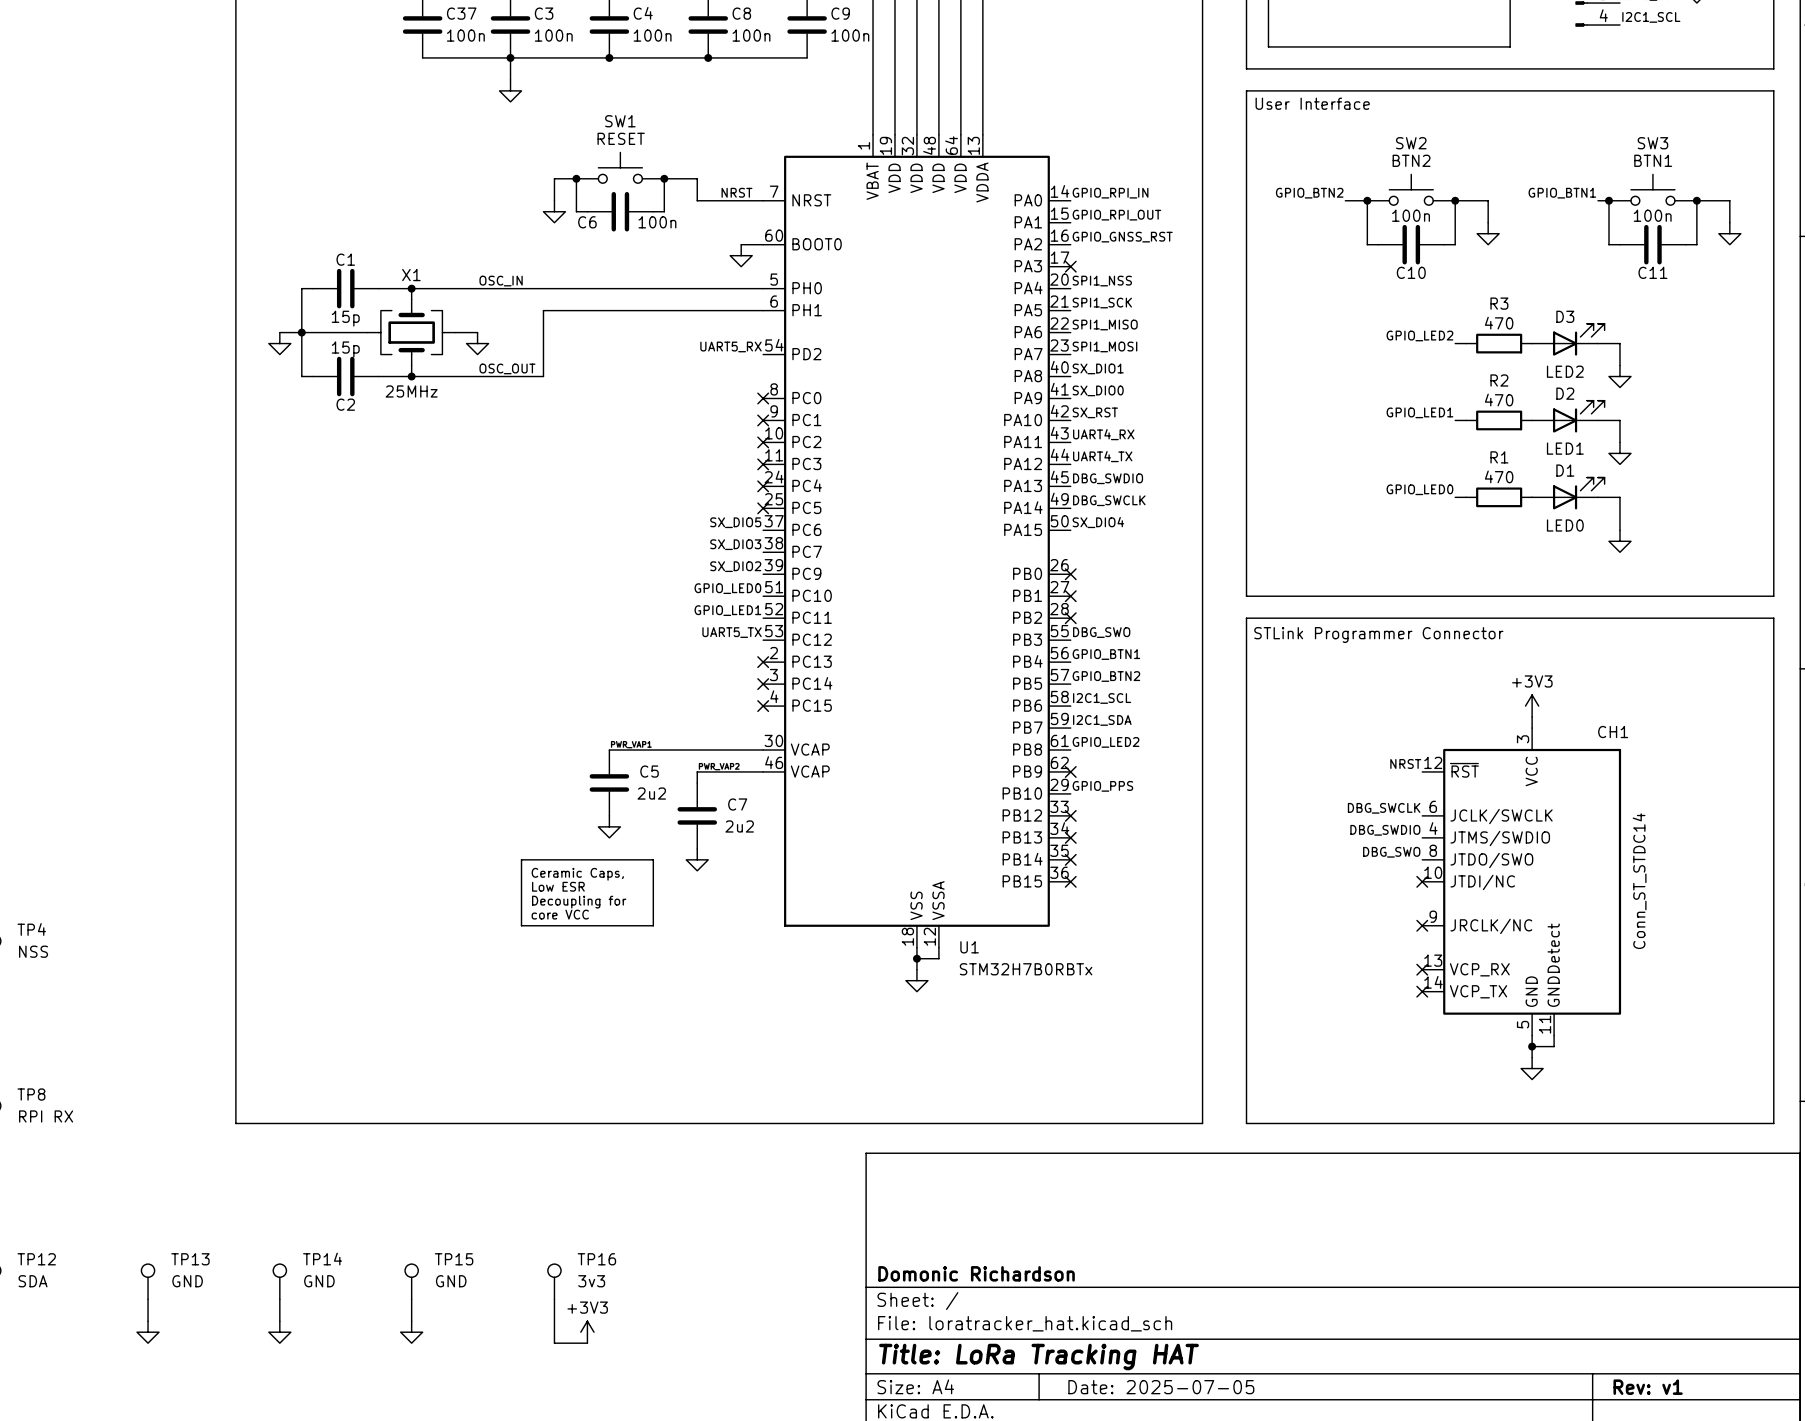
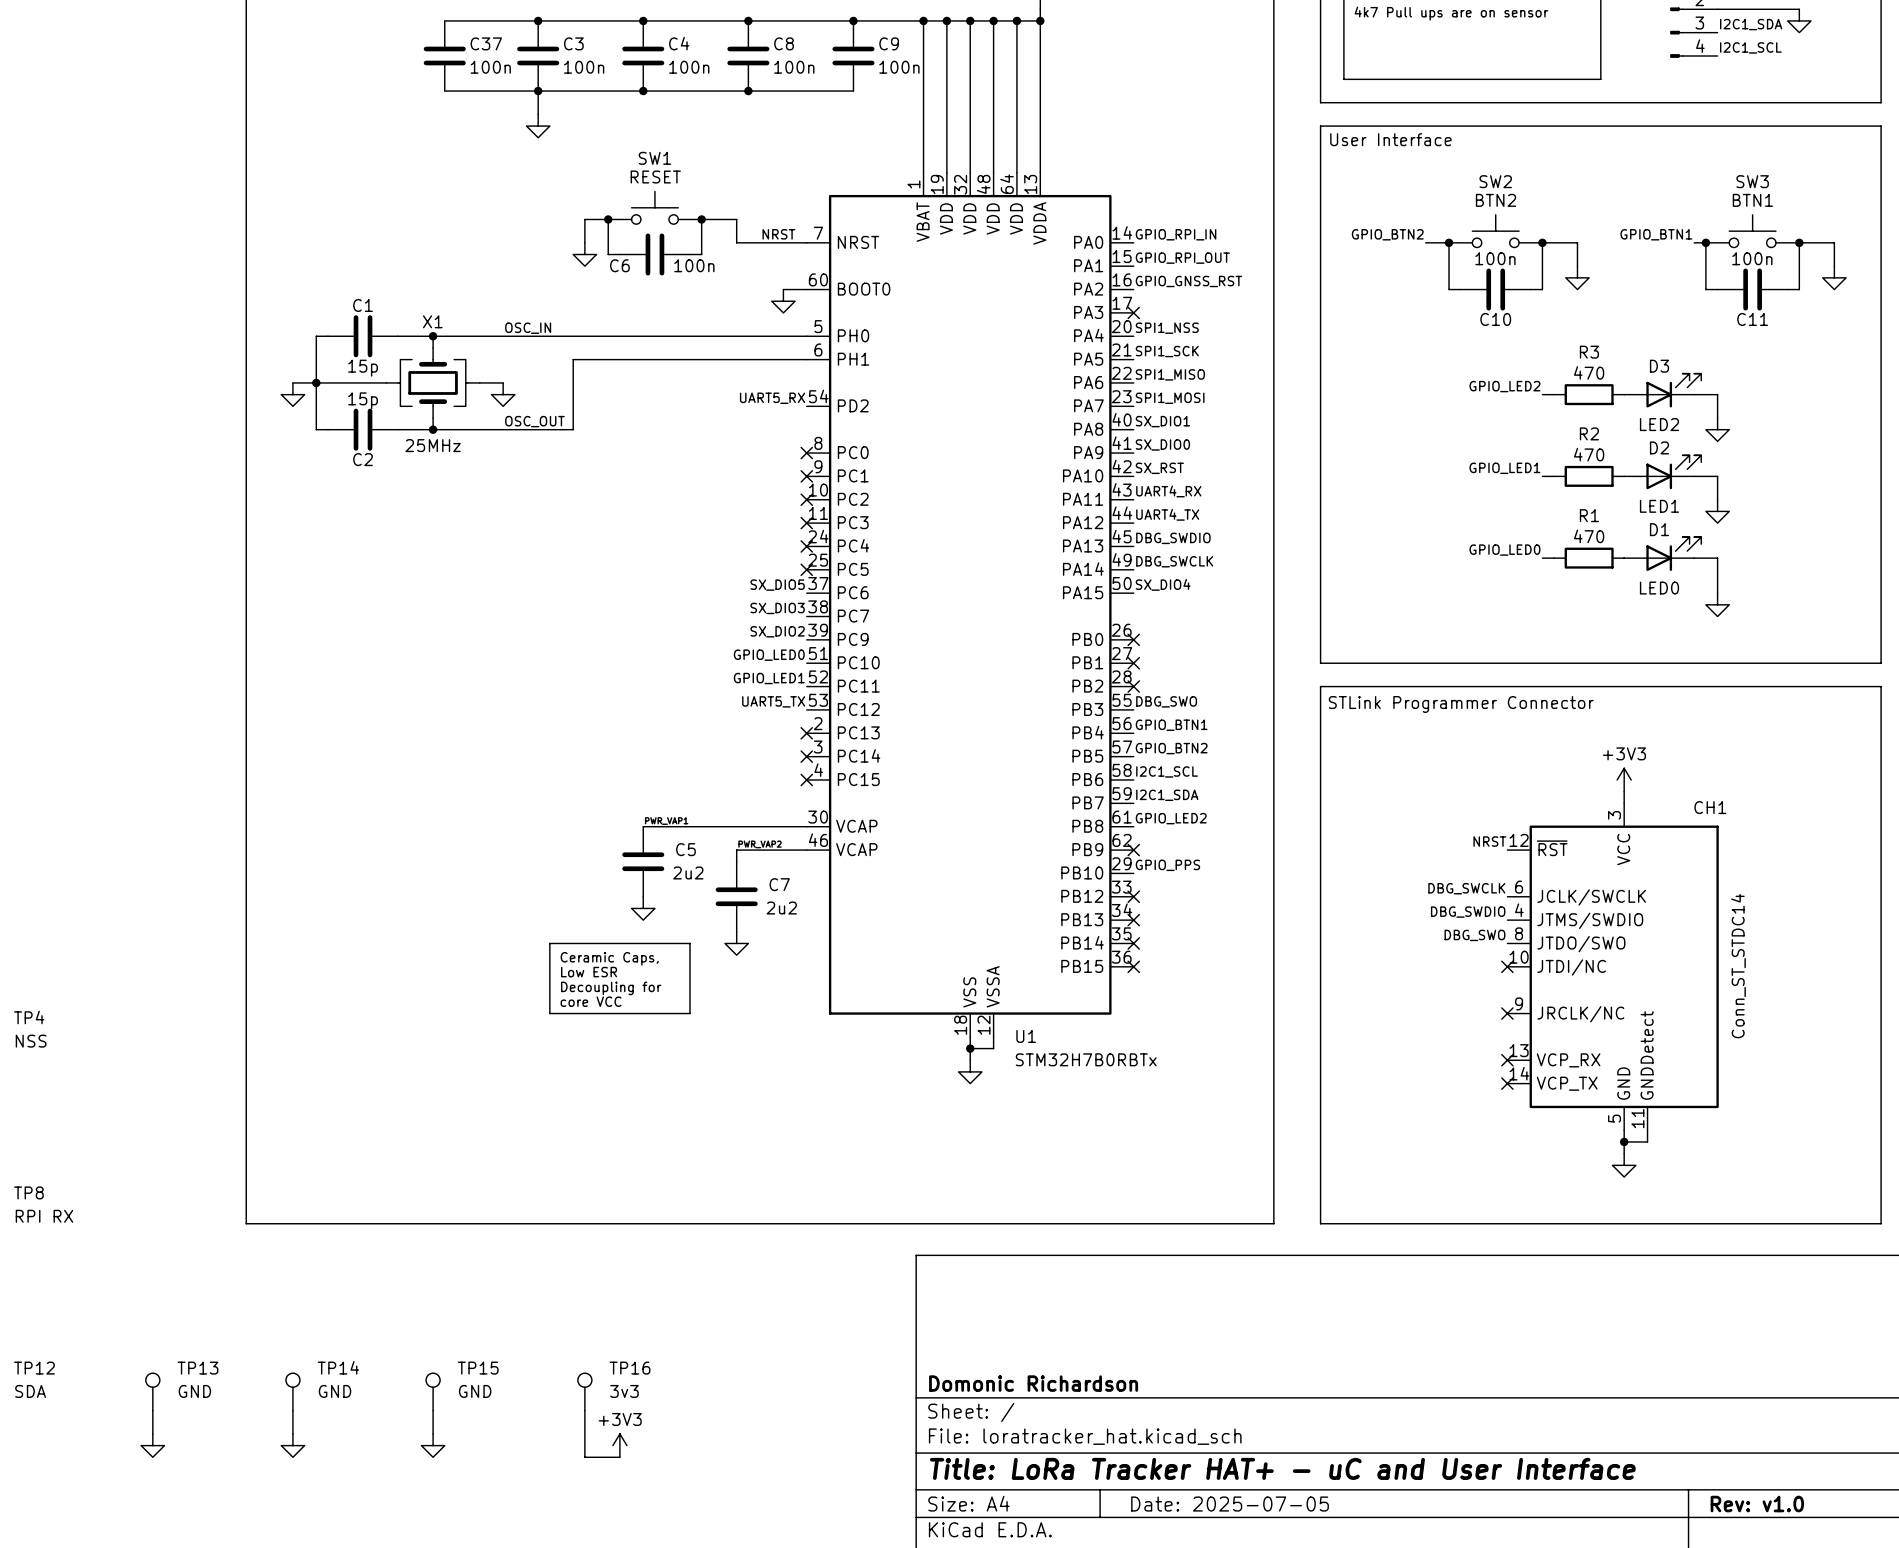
title block: Title: LoRa Tracking HAT (1038, 1357) -> Title: LoRa Tracker HAT+ - uC and User Interface (1282, 1468)
title block: Rev: v1 (1648, 1387) -> Rev: v1.0 (1757, 1504)

